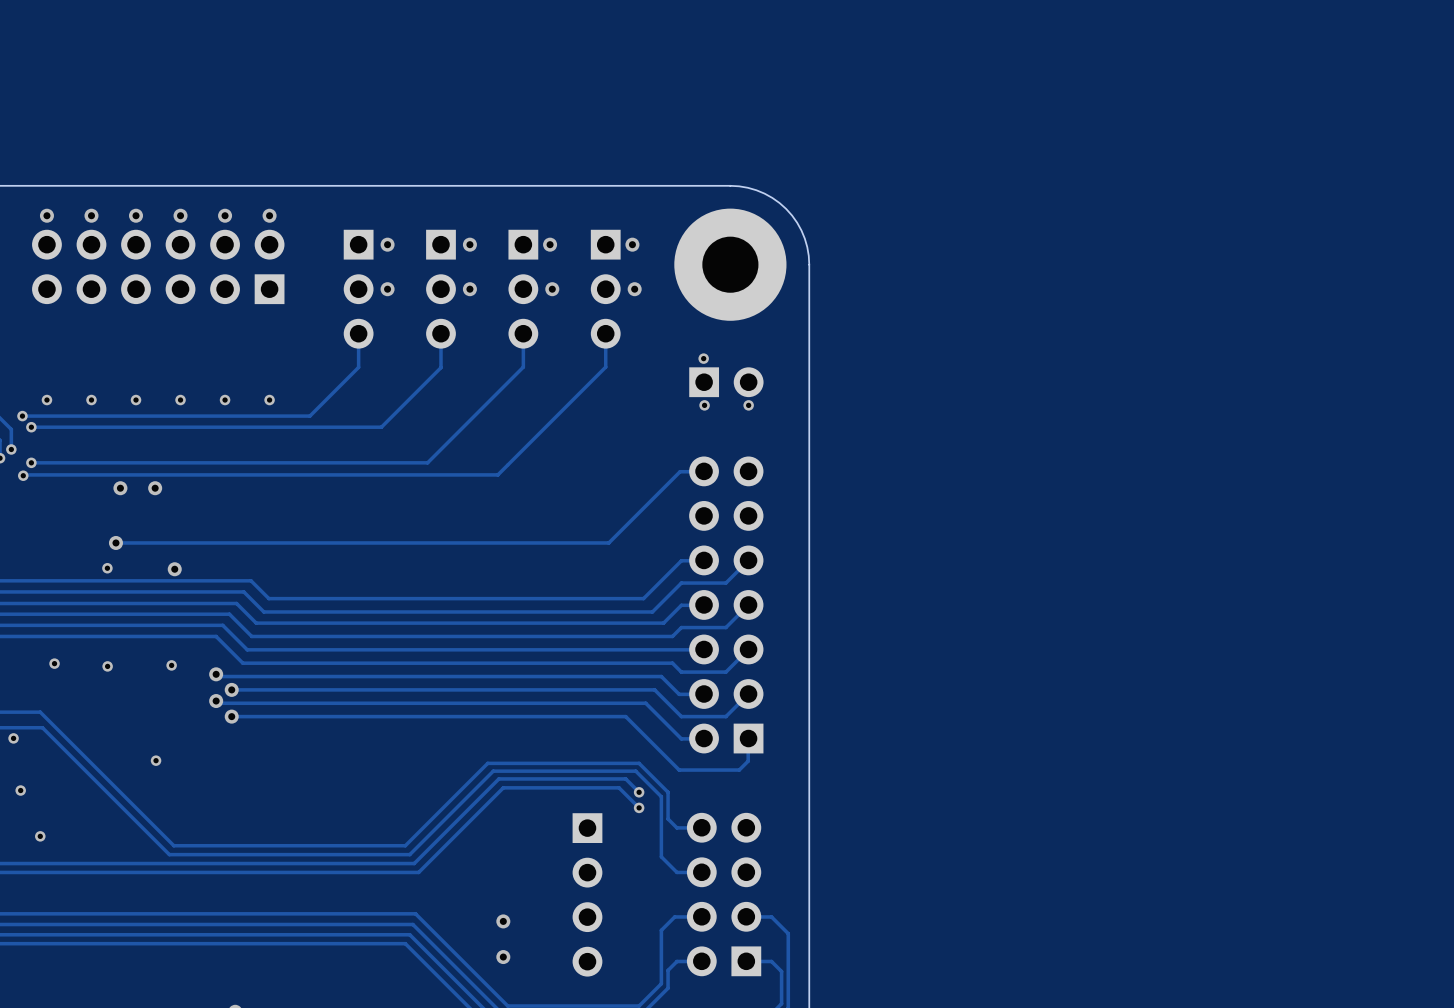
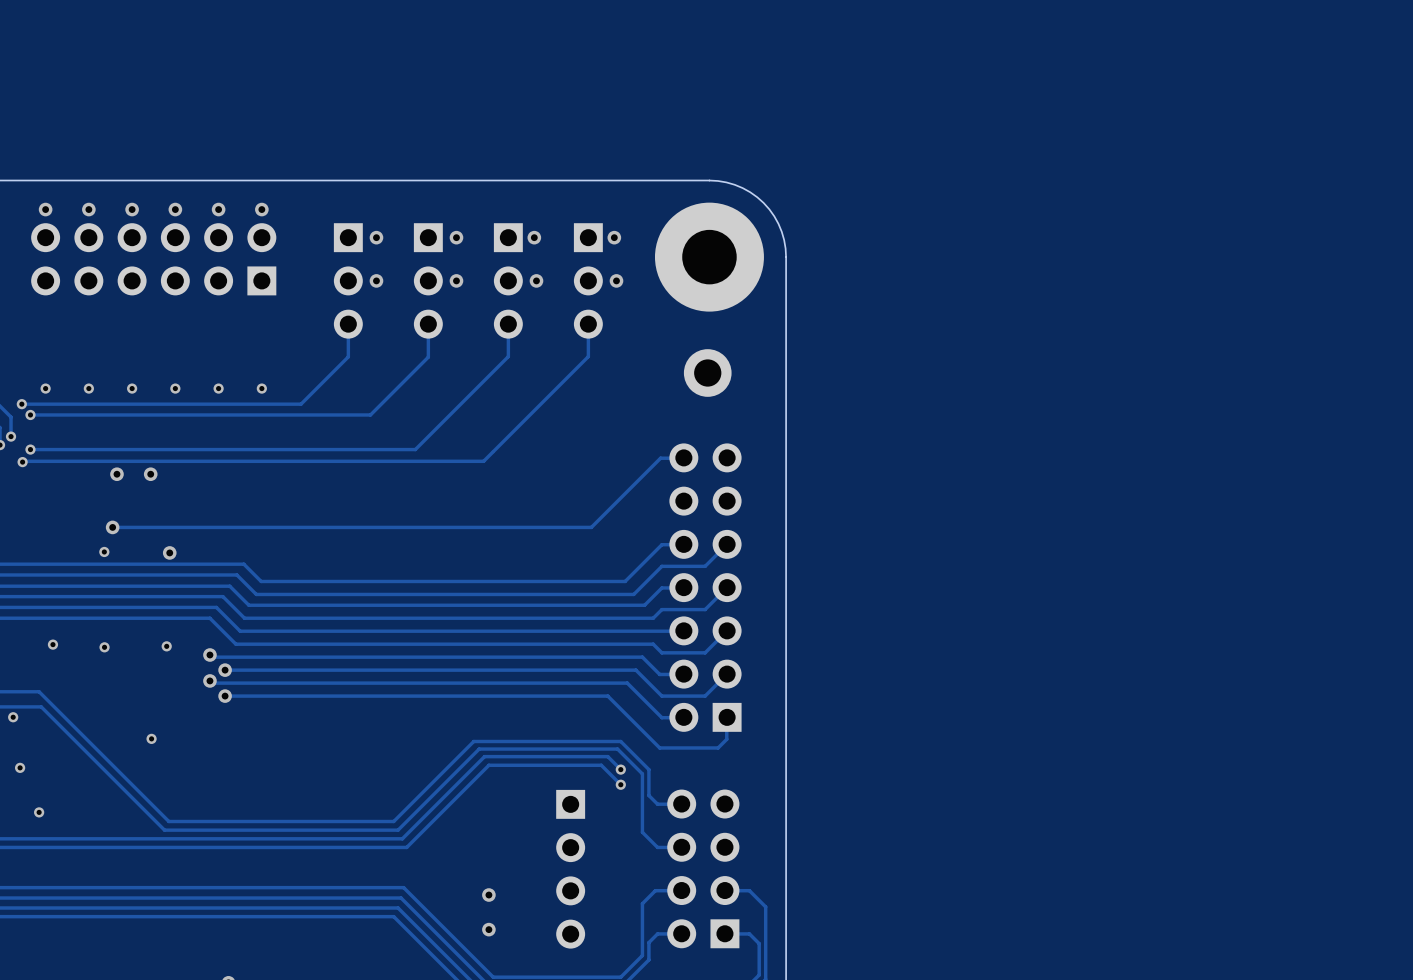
via: (703, 358) -> none
part footprint: [689, 367, 764, 398] -> [683, 349, 732, 397]
via: (704, 405) -> none
via: (748, 405) -> none

